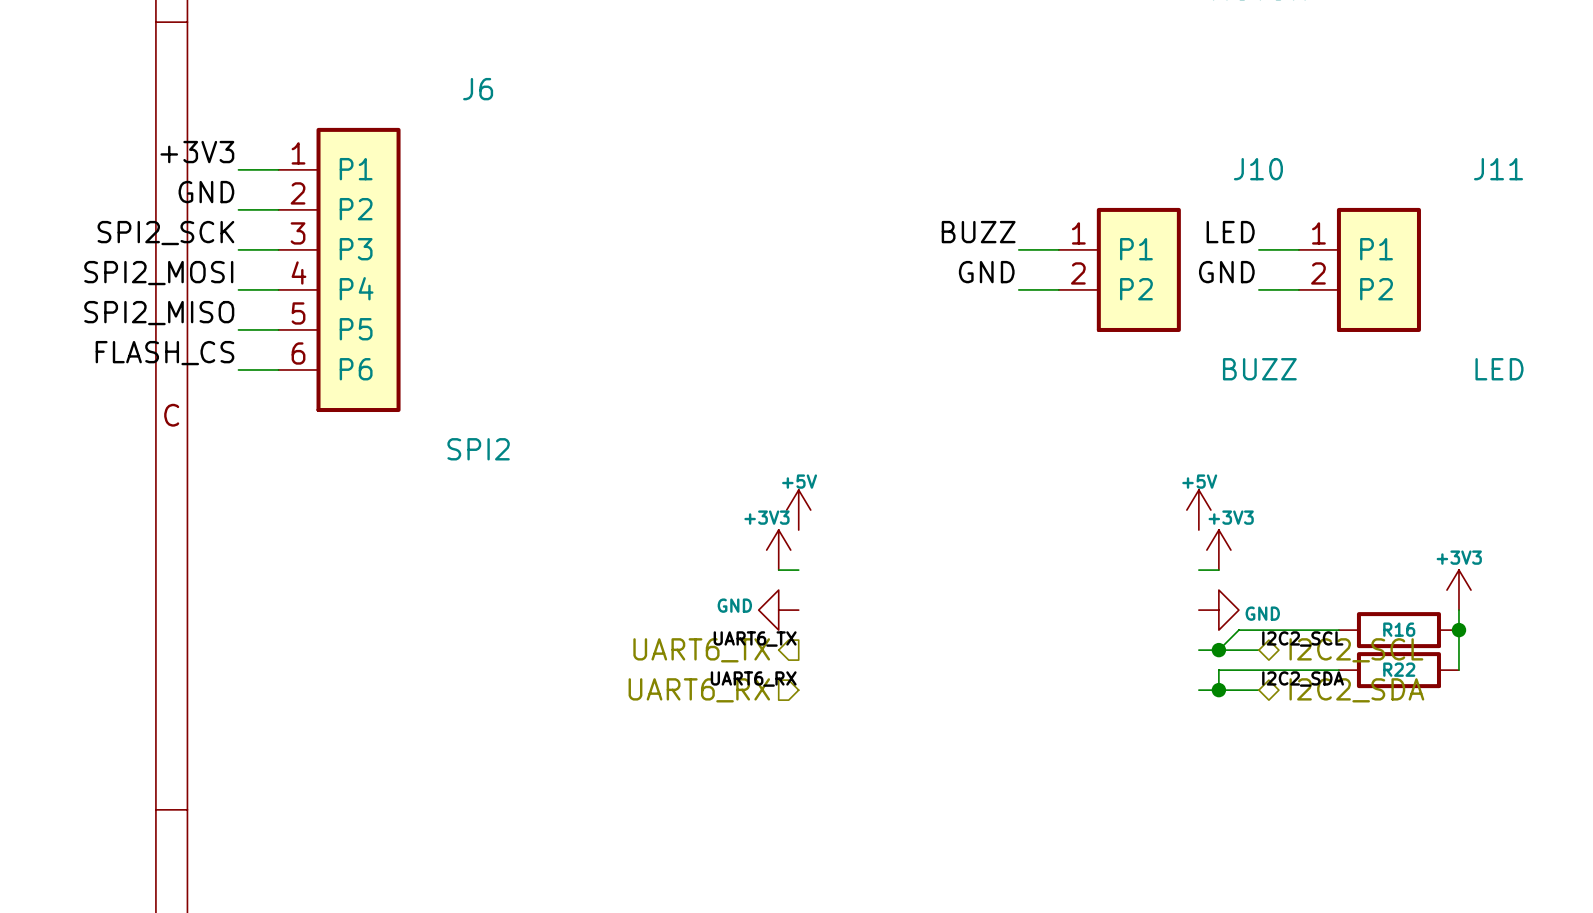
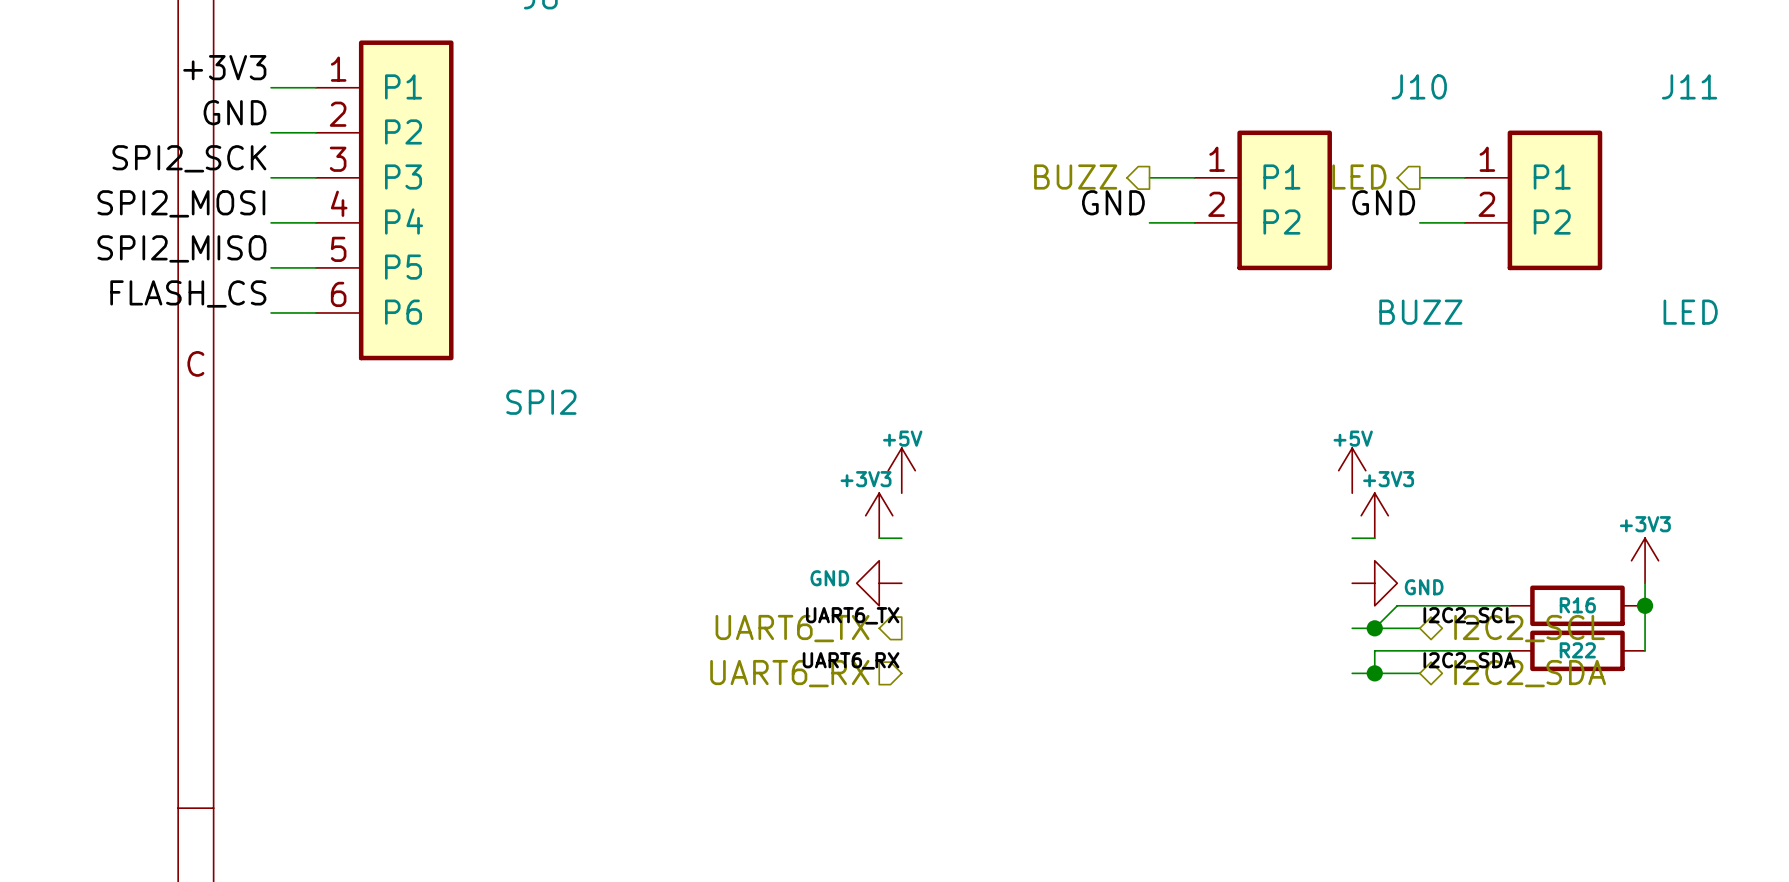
label: BUZZ (978, 232) -> none
label: LED (1230, 232) -> none
hierarchical label: none -> BUZZ (1075, 177)
hierarchical label: none -> LED (1359, 177)

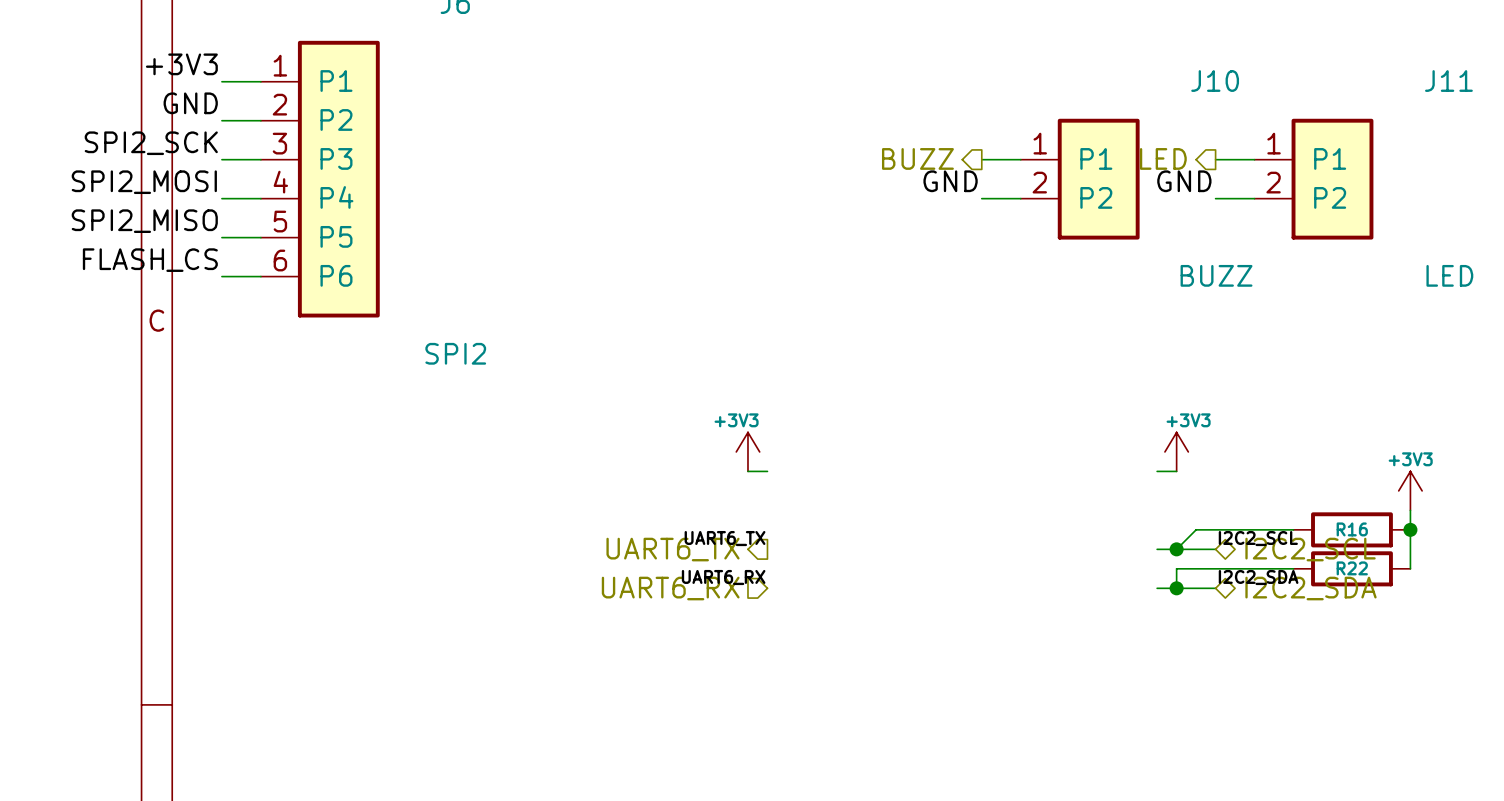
power symbol: +5V (901, 470) -> none
power symbol: +5V (1352, 470) -> none
power symbol: GND (879, 583) -> none
power symbol: GND (1374, 583) -> none

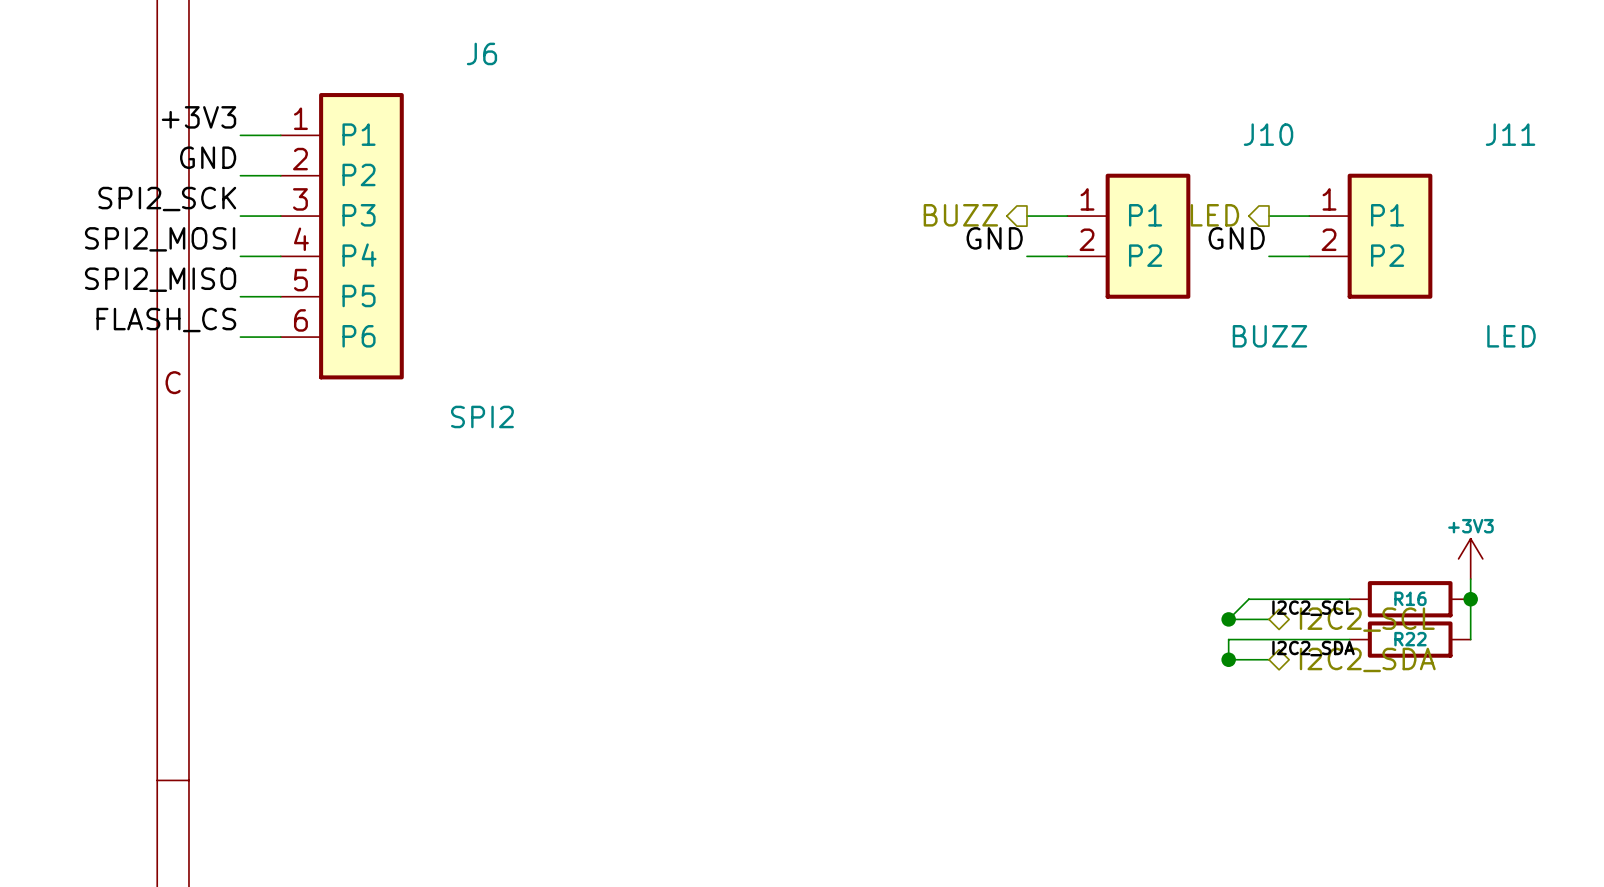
power symbol: +3V3 (747, 451) -> none
power symbol: +3V3 (1176, 451) -> none
wire: (747, 471) (767, 471) -> none
wire: (1157, 471) (1176, 471) -> none
label: UART6_TX (725, 538) -> none
hierarchical label: UART6_TX (673, 549) -> none
wire: (1157, 549) (1176, 549) -> none
label: UART6_RX (723, 577) -> none
hierarchical label: UART6_RX (670, 588) -> none
wire: (1157, 588) (1176, 588) -> none

